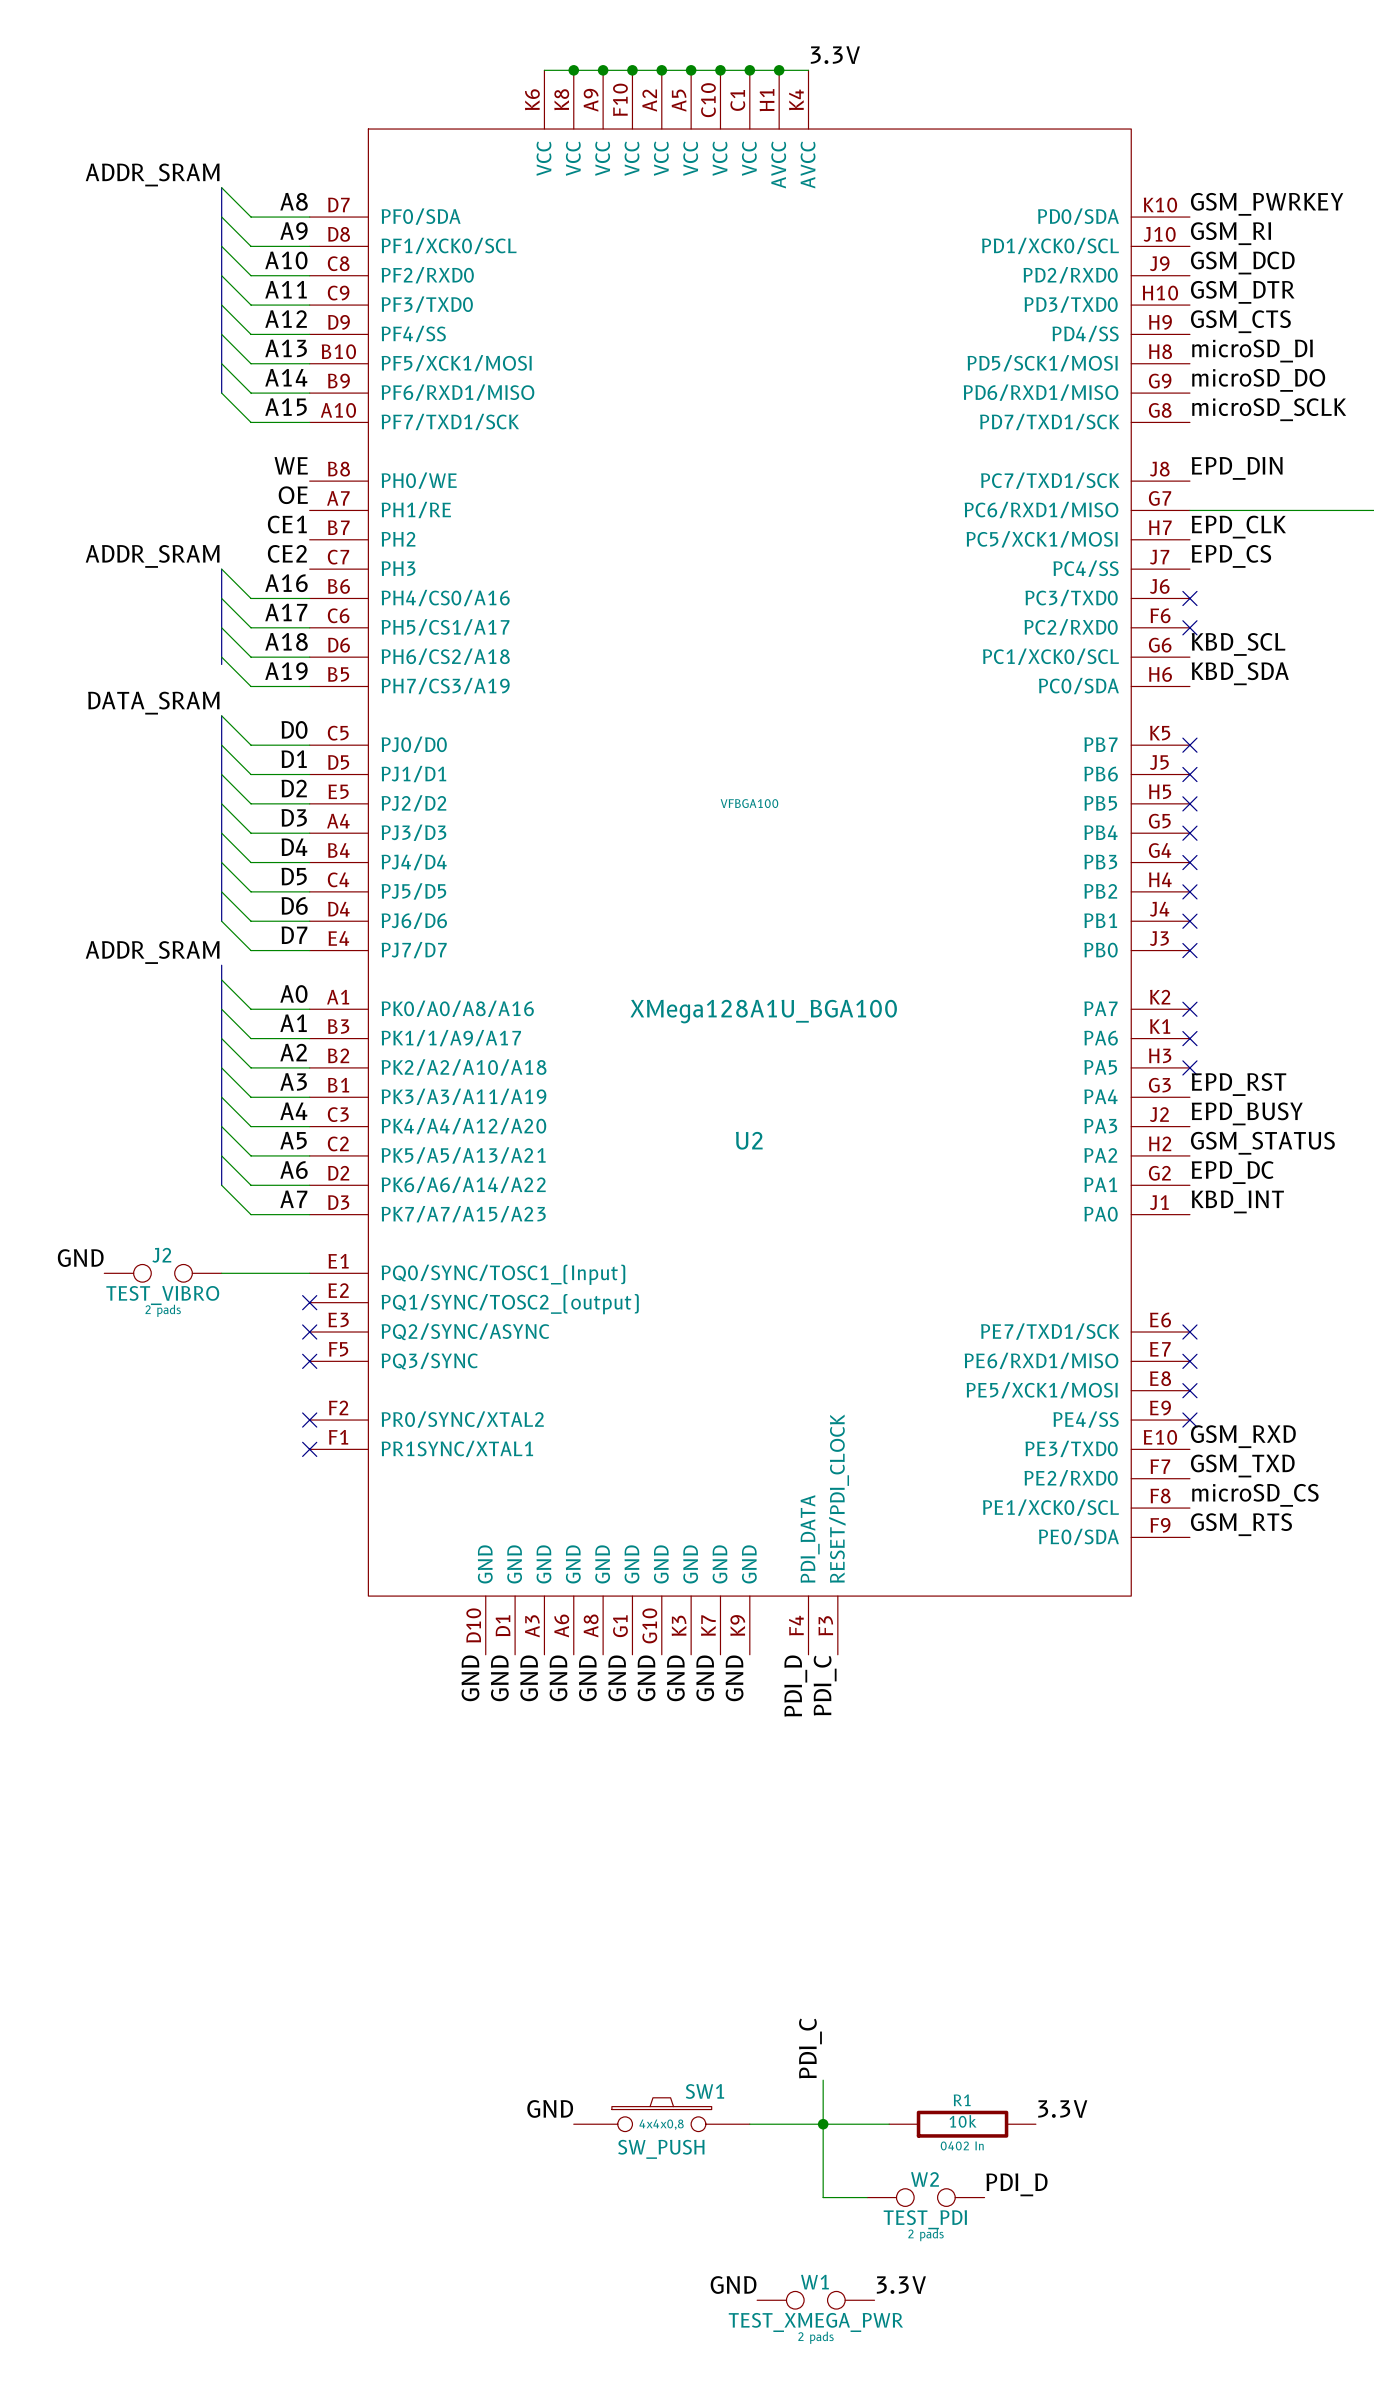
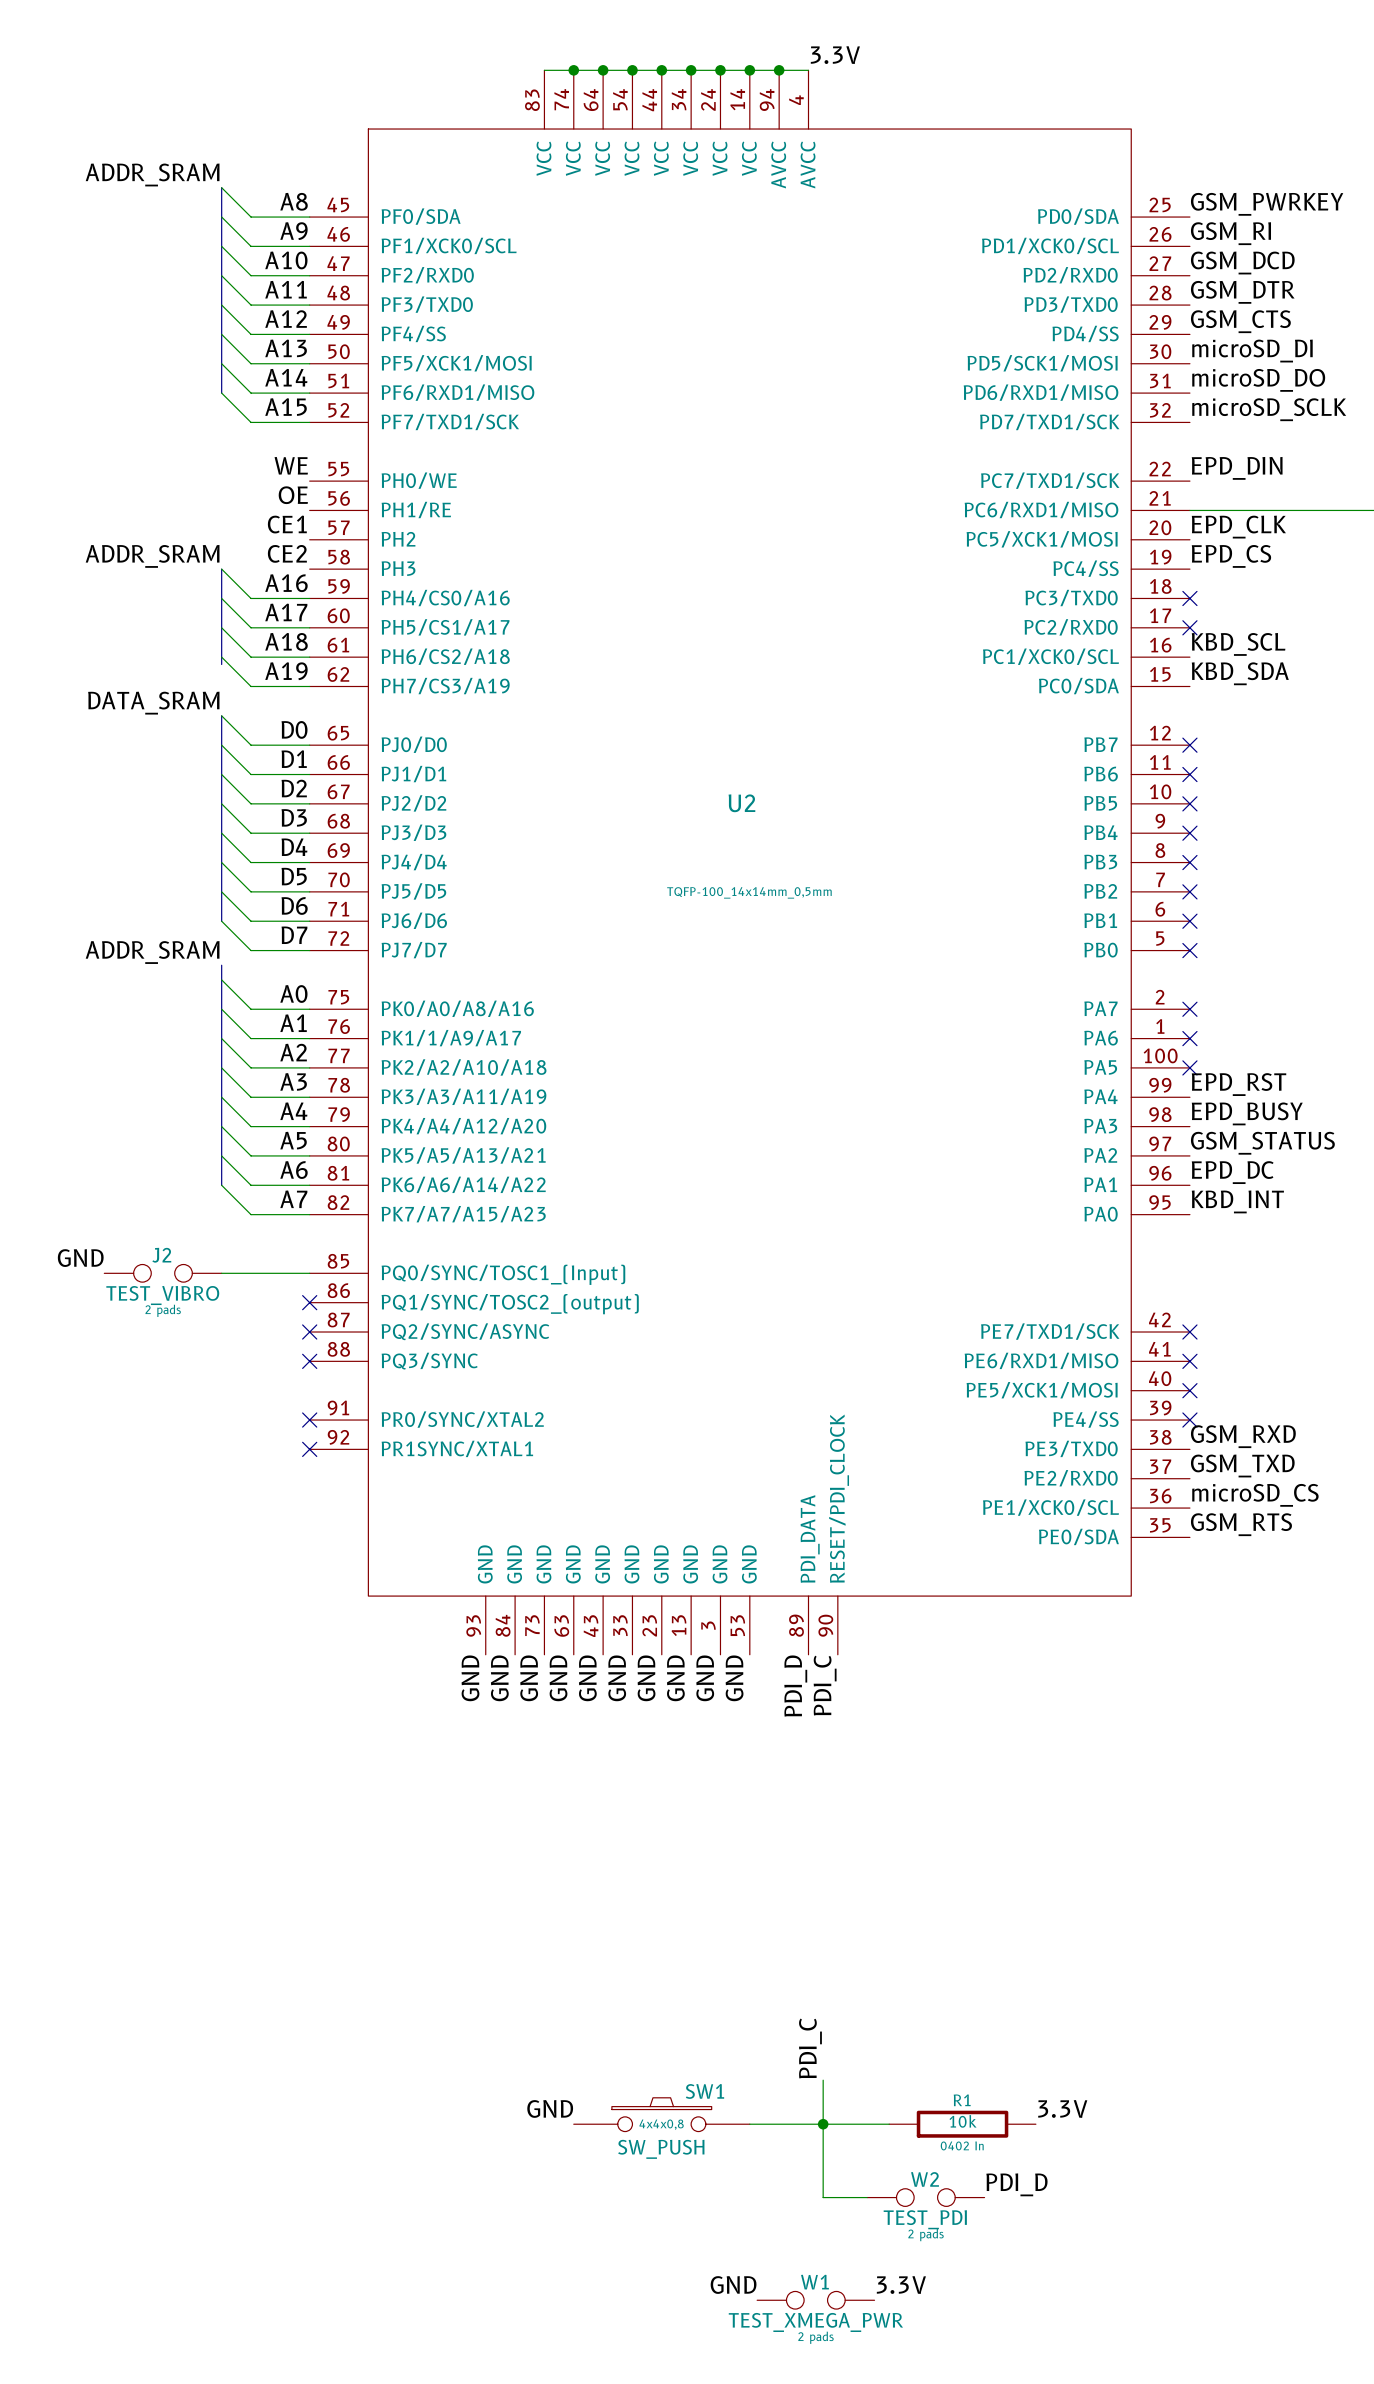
U2 symbol: [309, 70, 1190, 1655] -> [309, 70, 1190, 1655]
U2 text: VFBGA100 (749, 803) -> TQFP-100_14x14mm_0,5mm (749, 892)
U2 value: XMega128A1U_BGA100 (763, 1011) -> none
U2 name position: U2 (749, 1140) -> U2 (741, 803)

